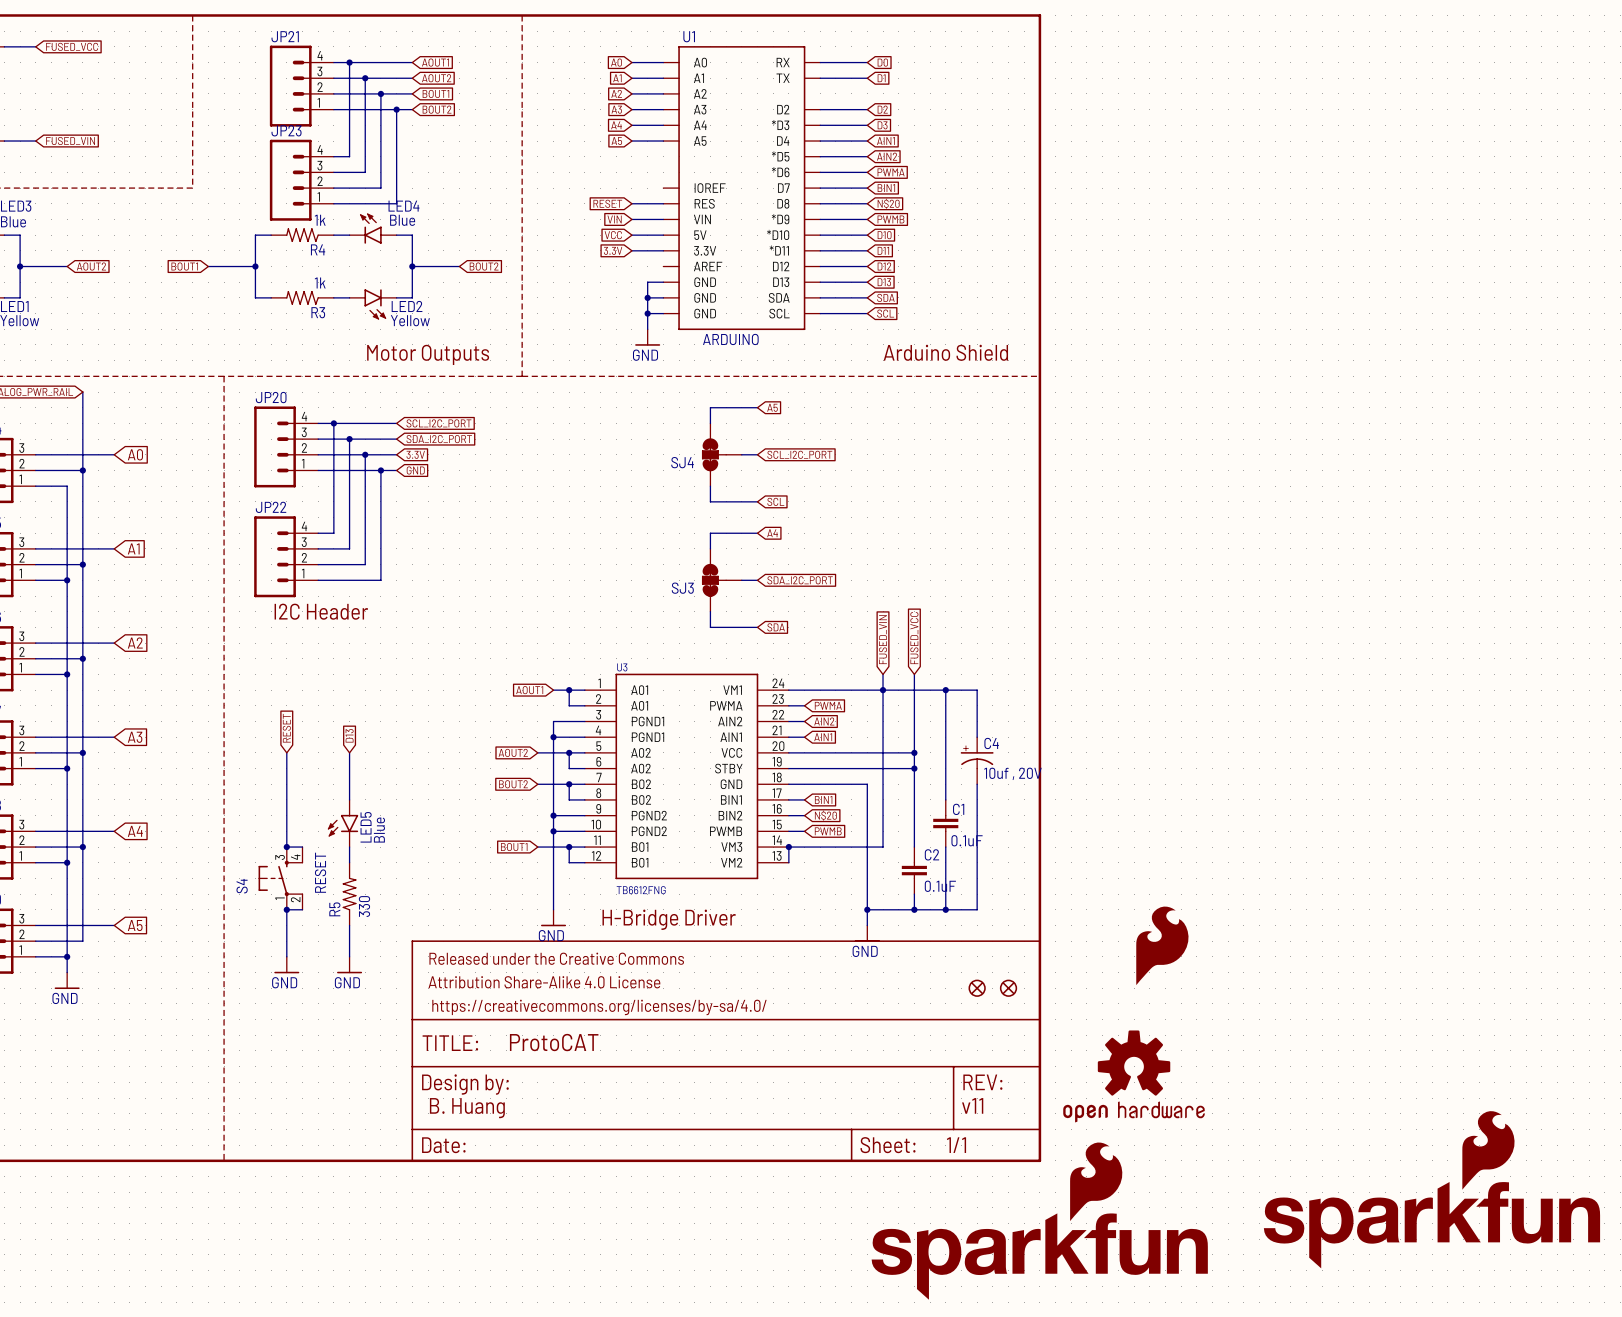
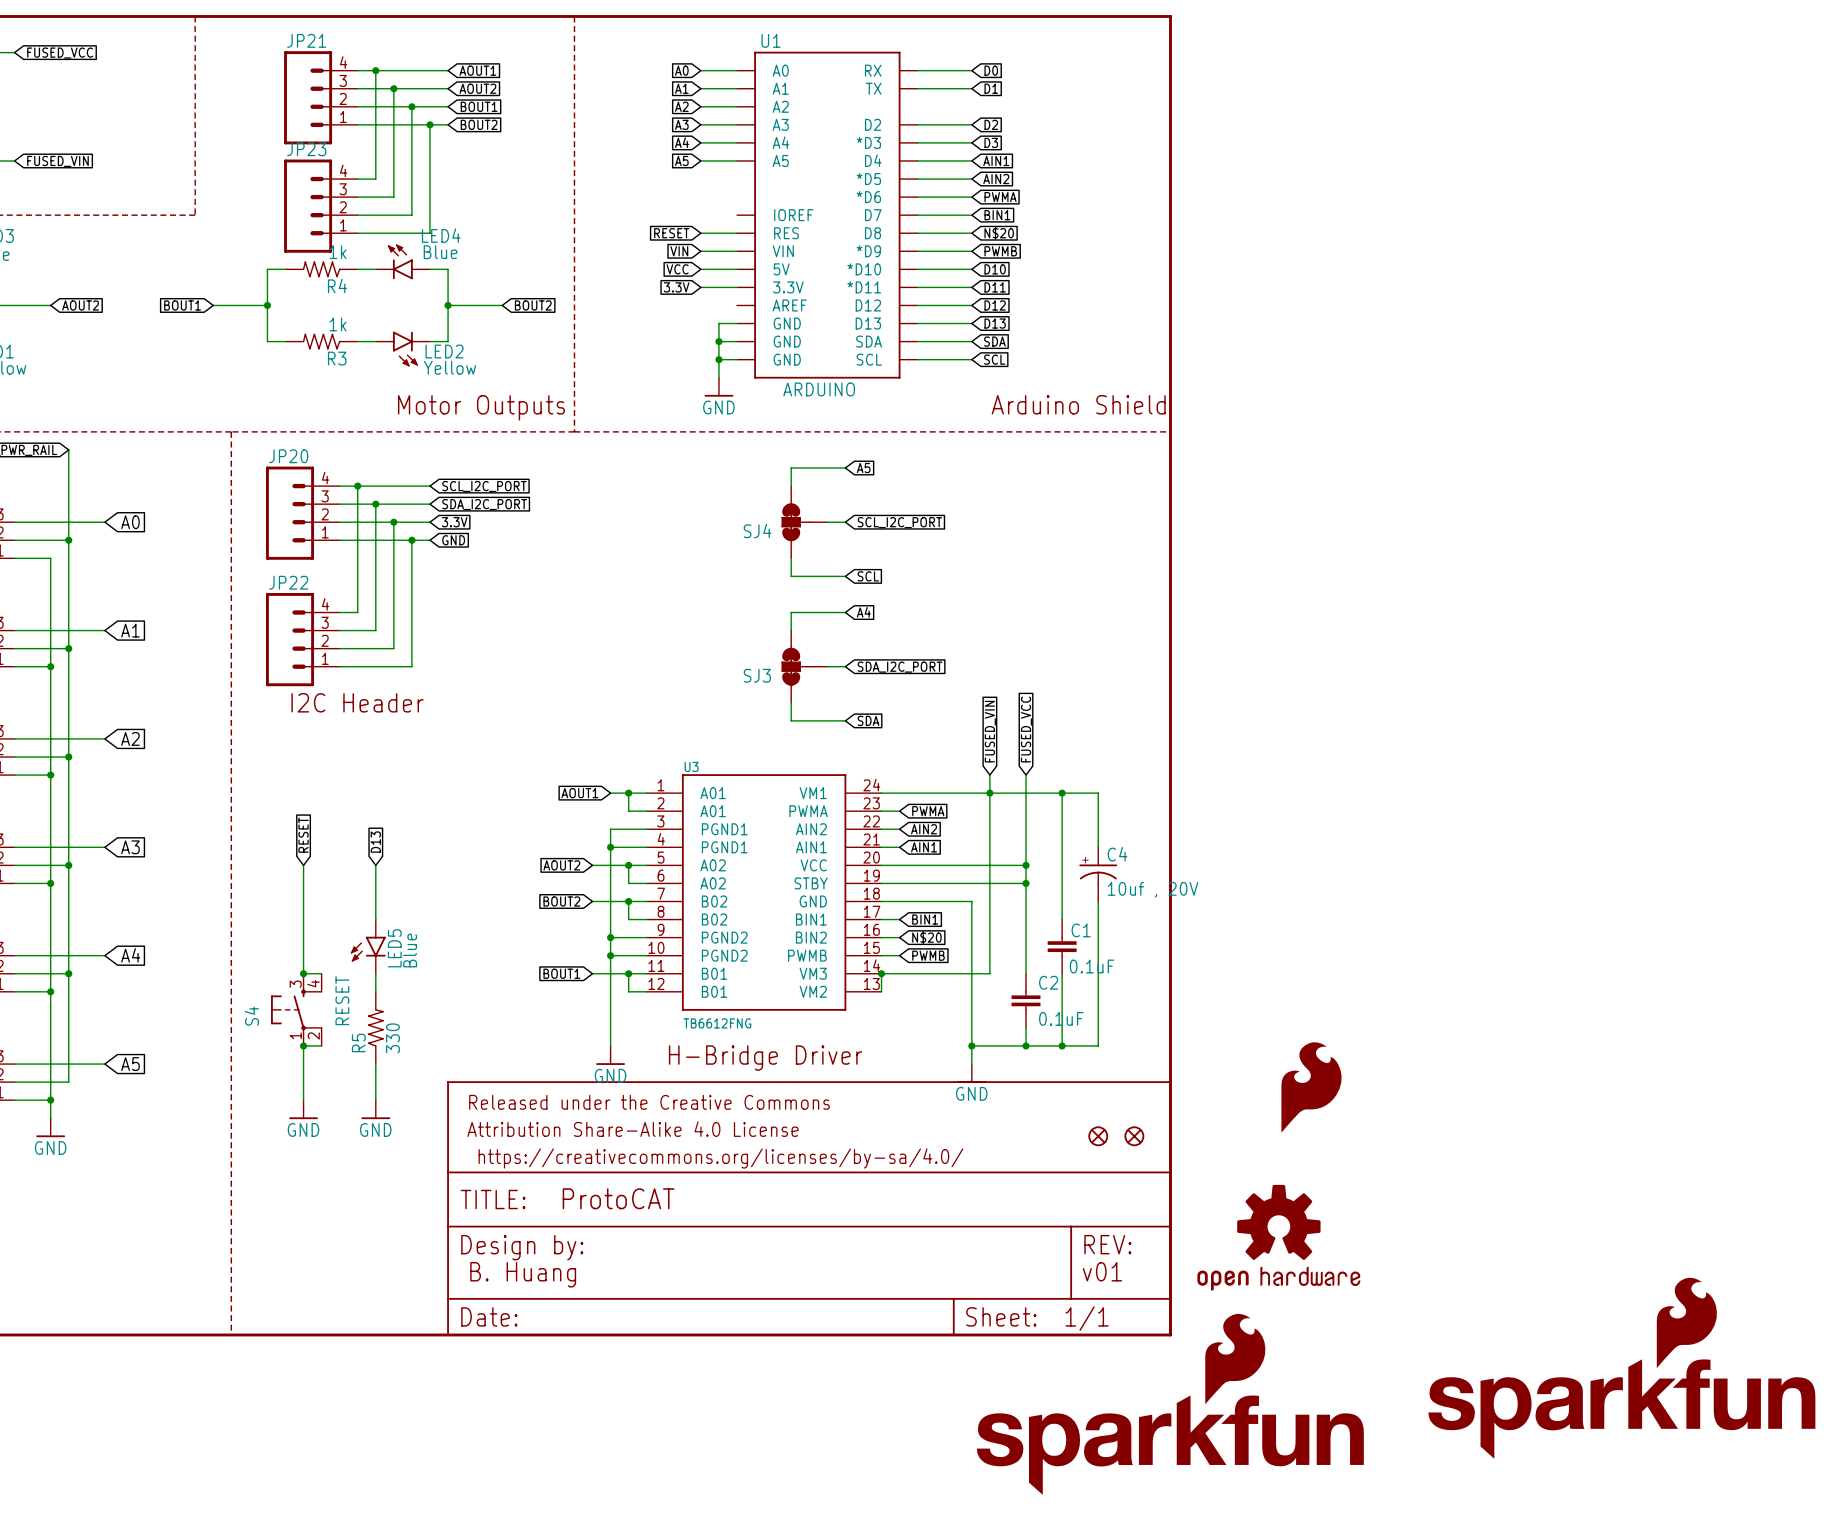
text: v11 (972, 1105) -> v01 (1102, 1271)

